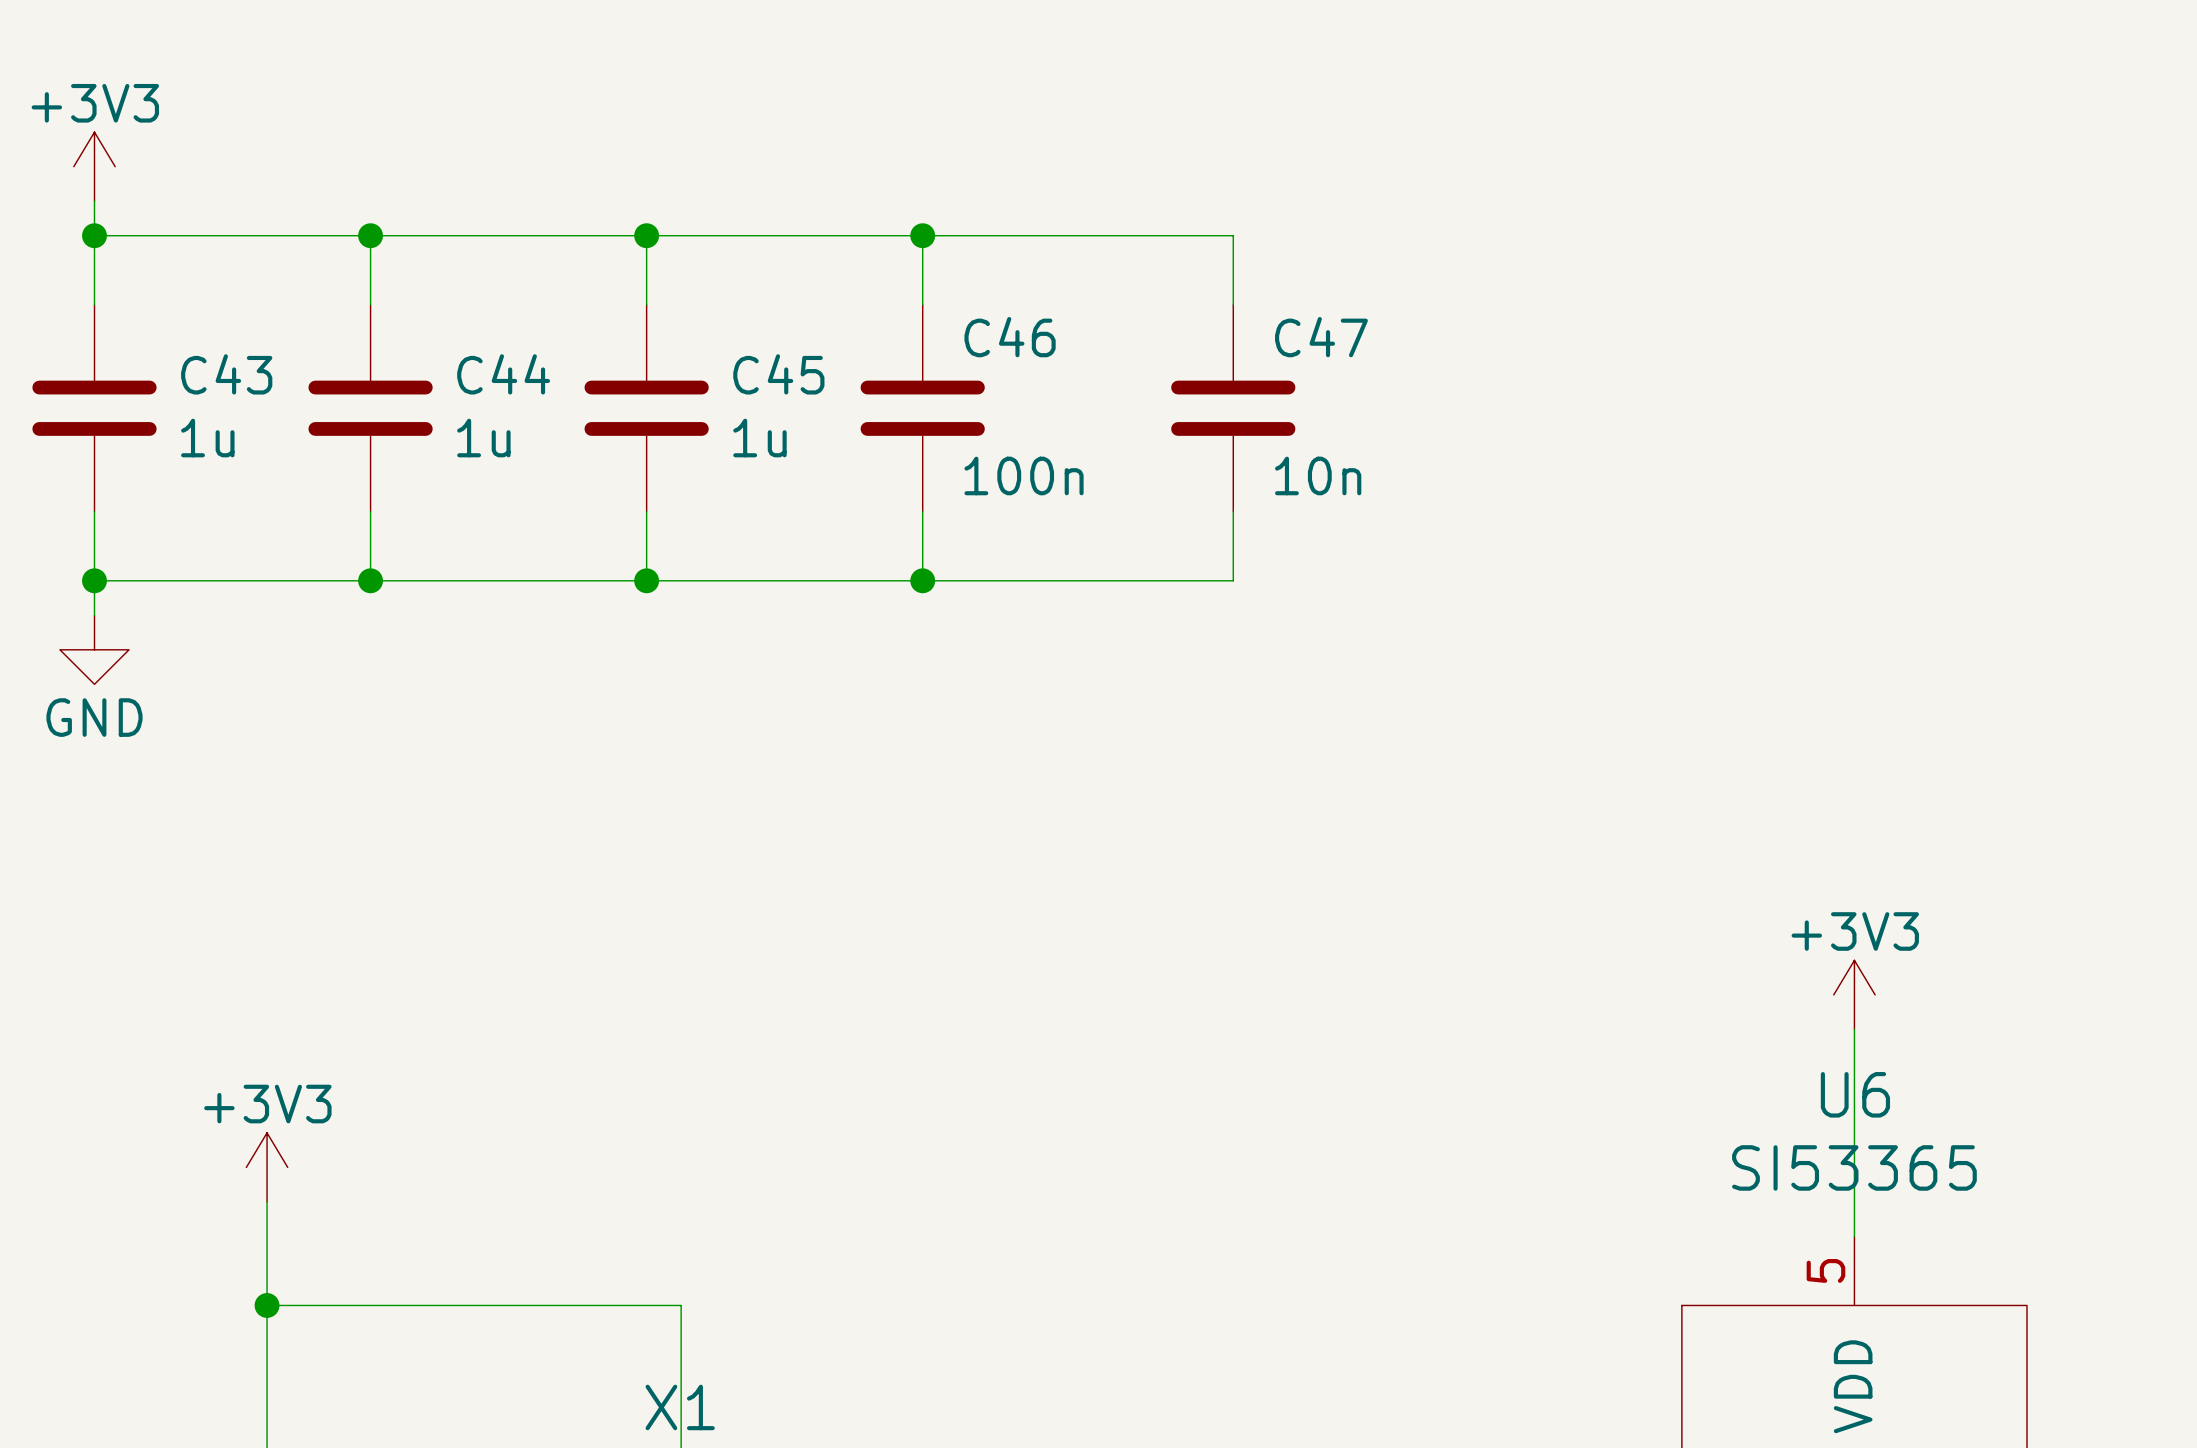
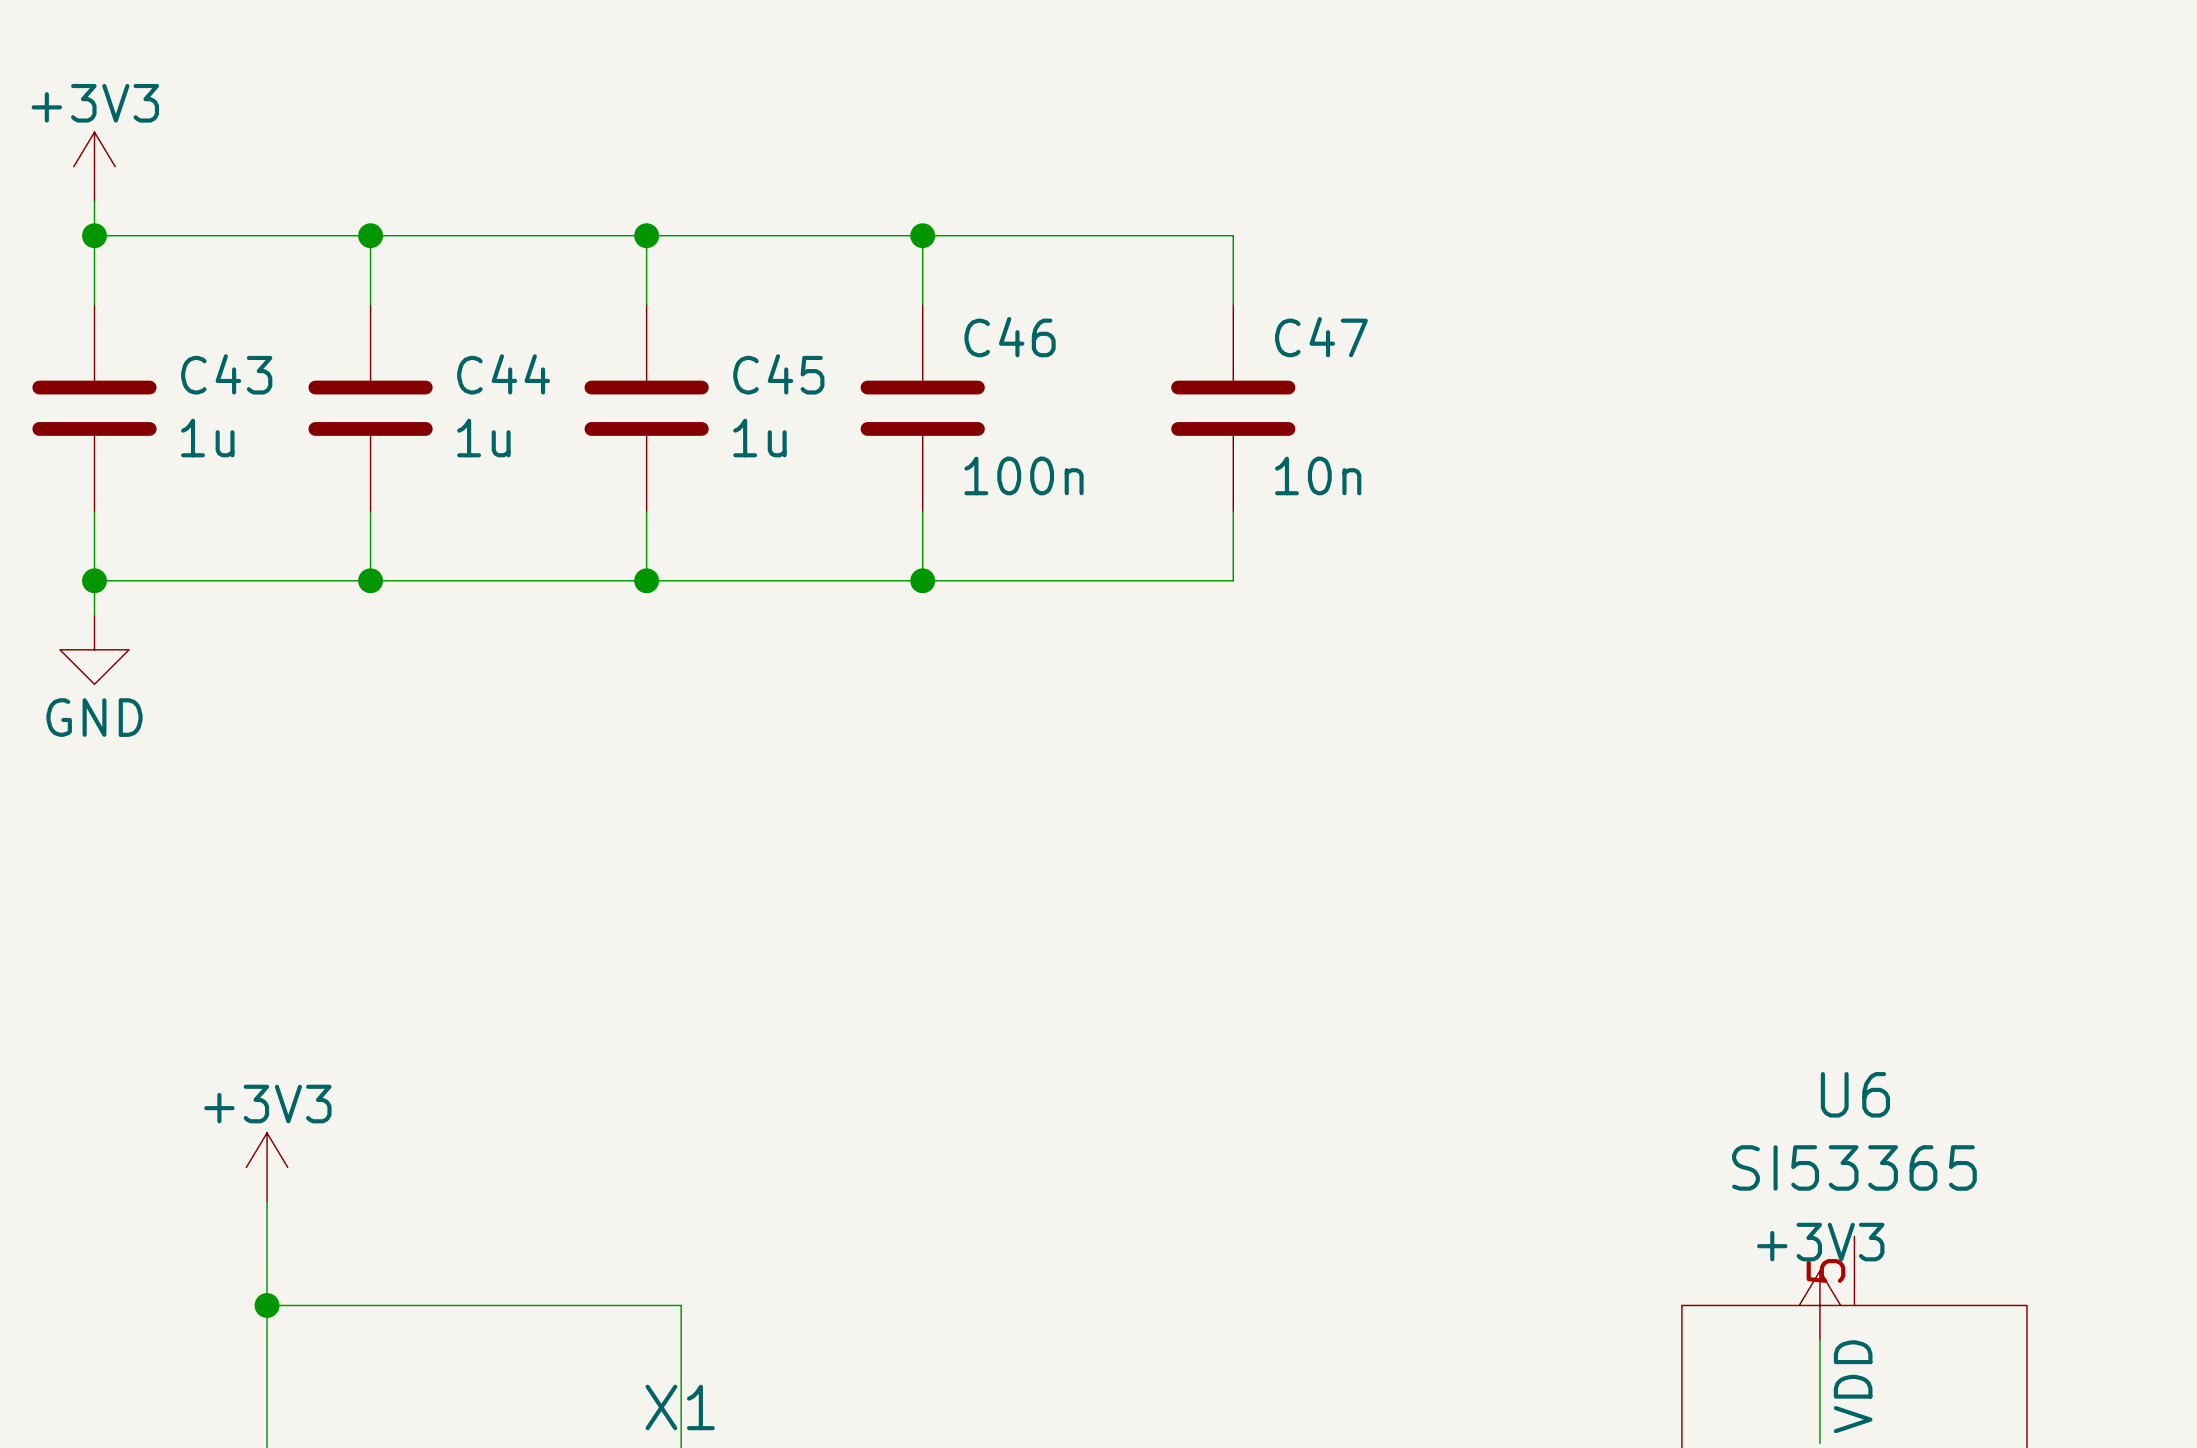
power symbol: +3V3 (1854, 994) -> none
wire: (1854, 1029) (1854, 1236) -> none
power symbol: none -> +3V3 (1819, 1305)
wire: none -> (1819, 1339) (1819, 1443)

